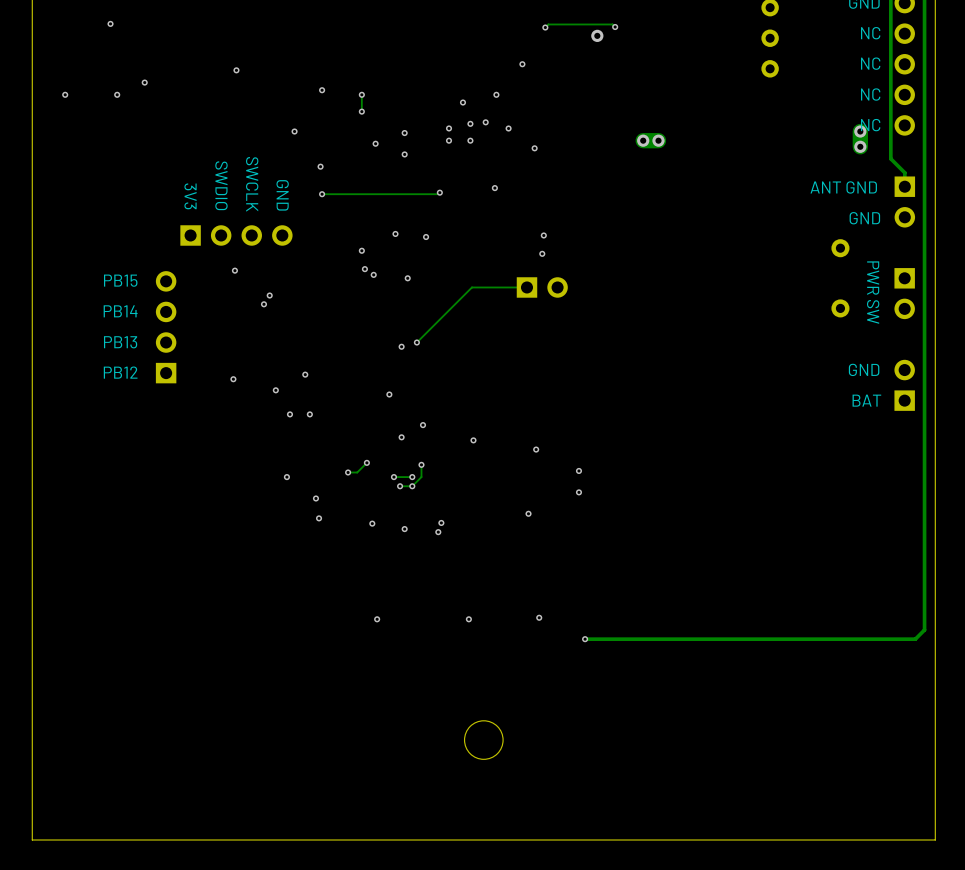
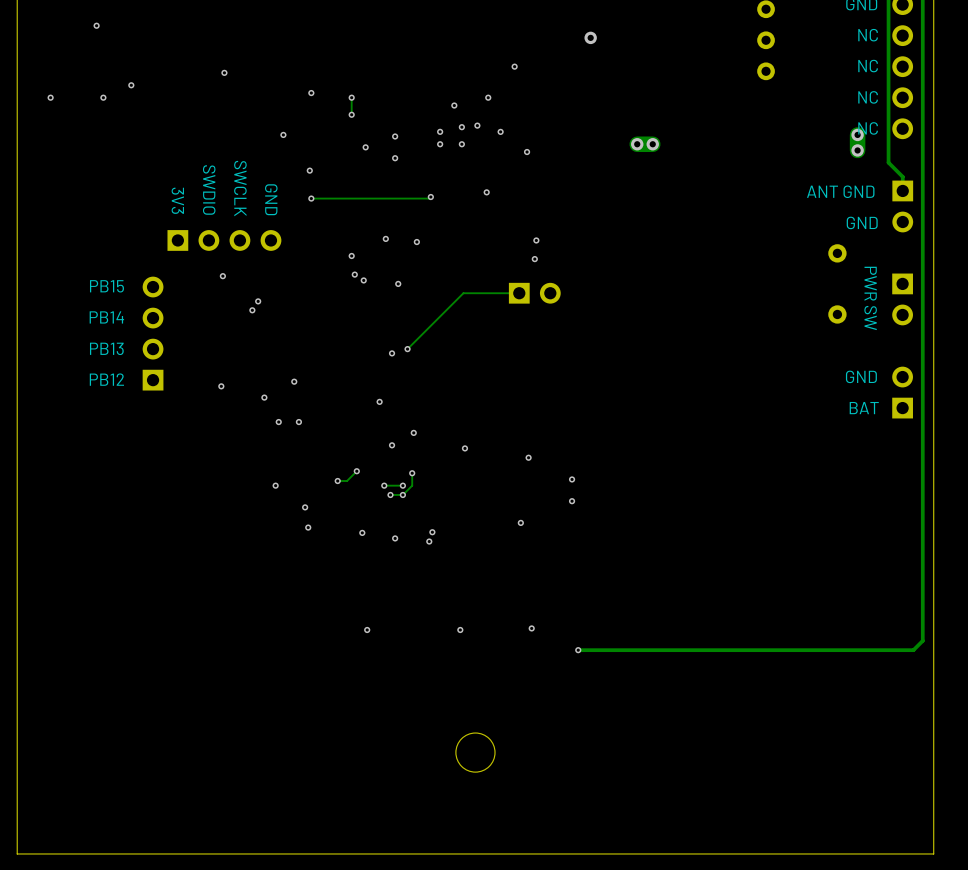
via: (545, 27) -> none
track: (615, 27) (612, 24) (548, 24) (545, 27) -> none
via: (615, 27) -> none

